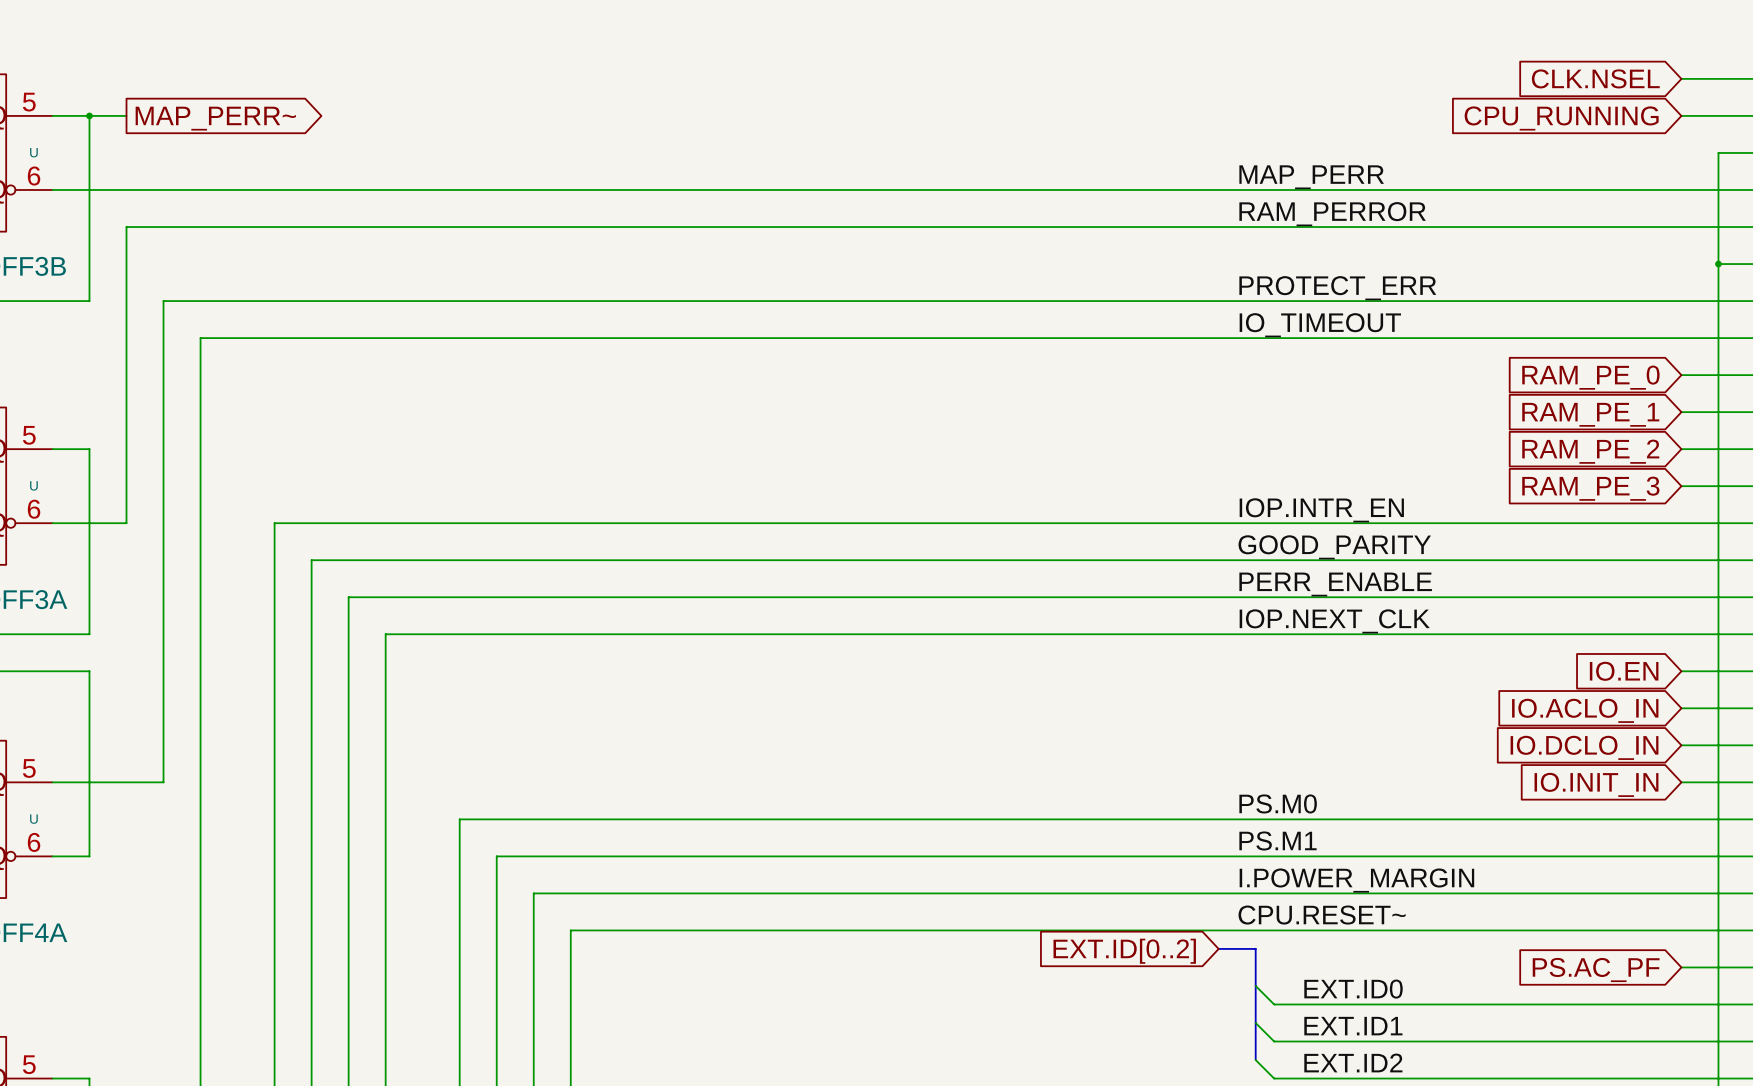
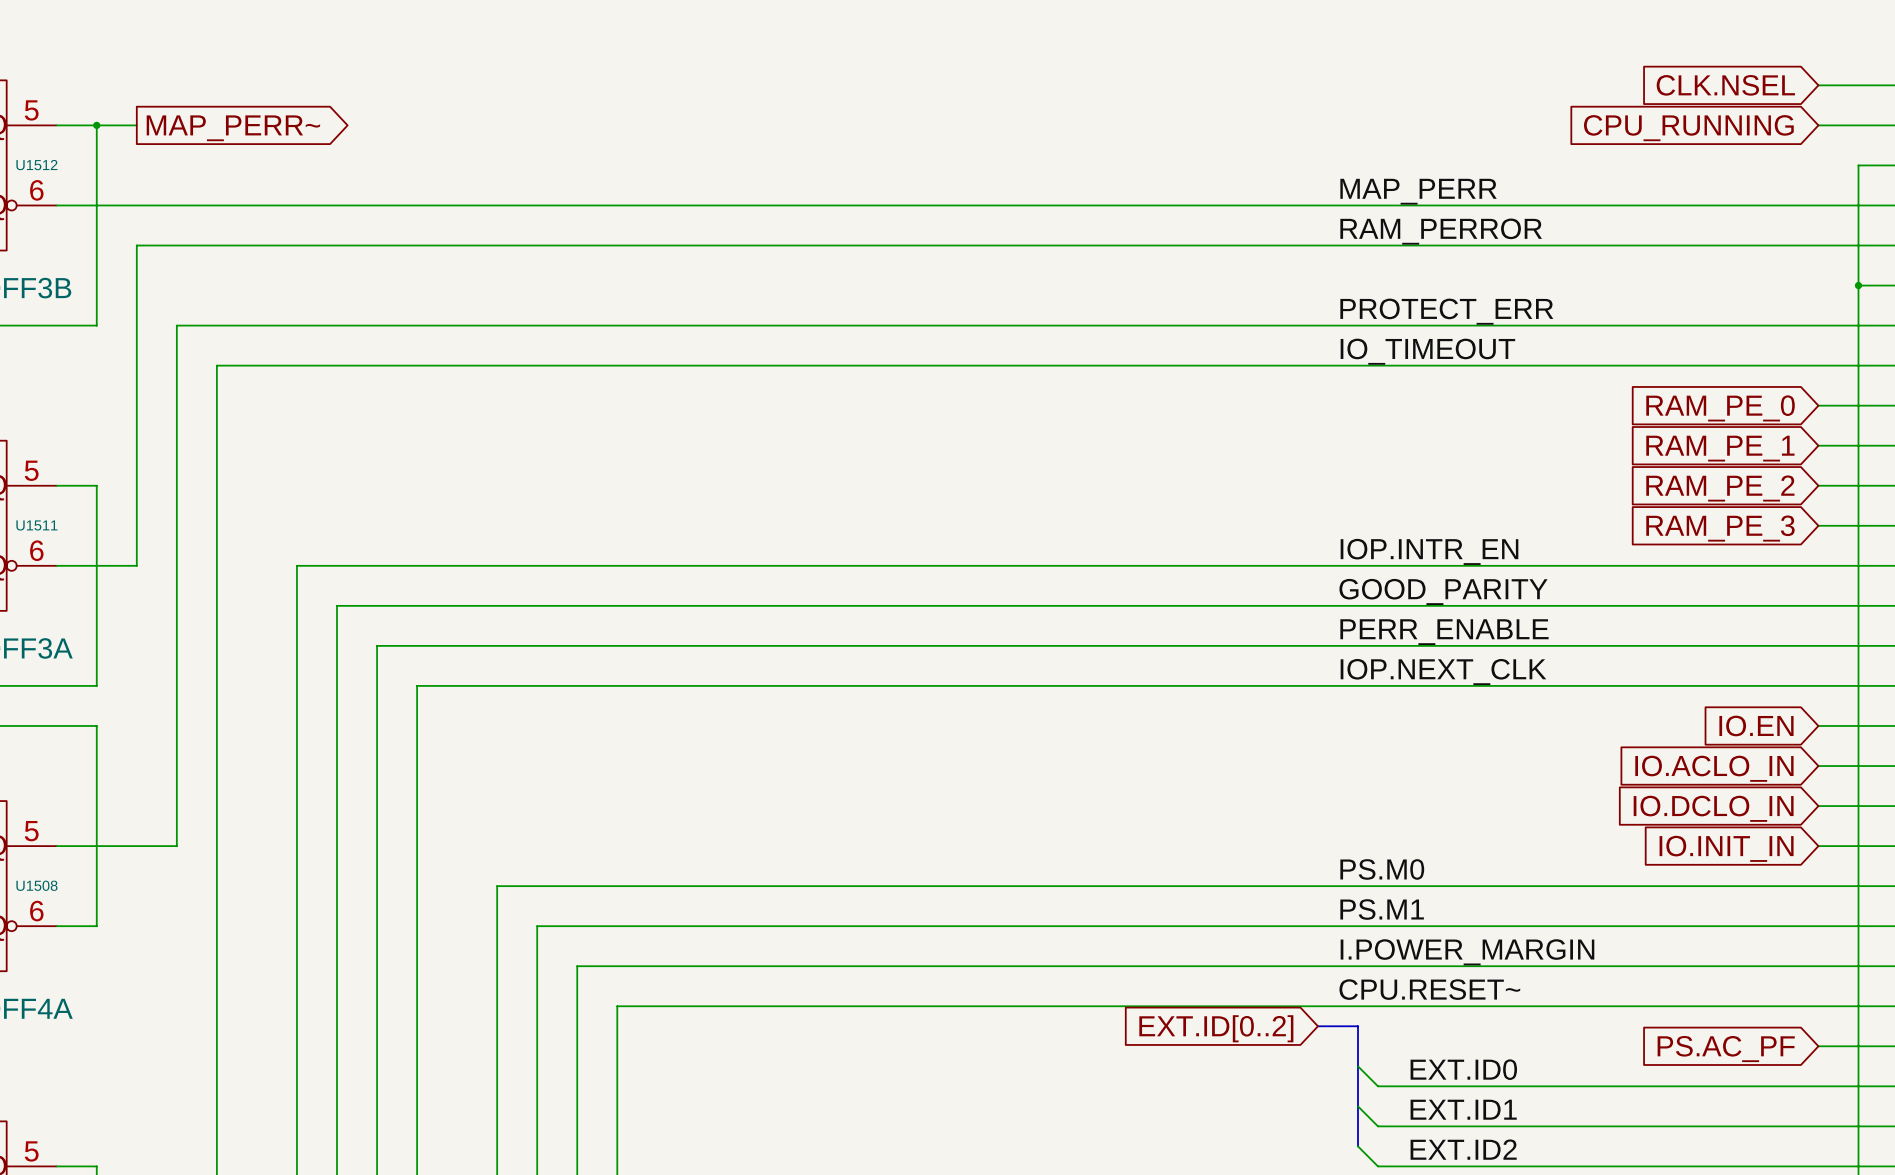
U name: U (33, 152) -> U1512 (36, 165)
U name: U (33, 485) -> U1511 (36, 525)
U name: U (33, 819) -> U1508 (36, 885)

